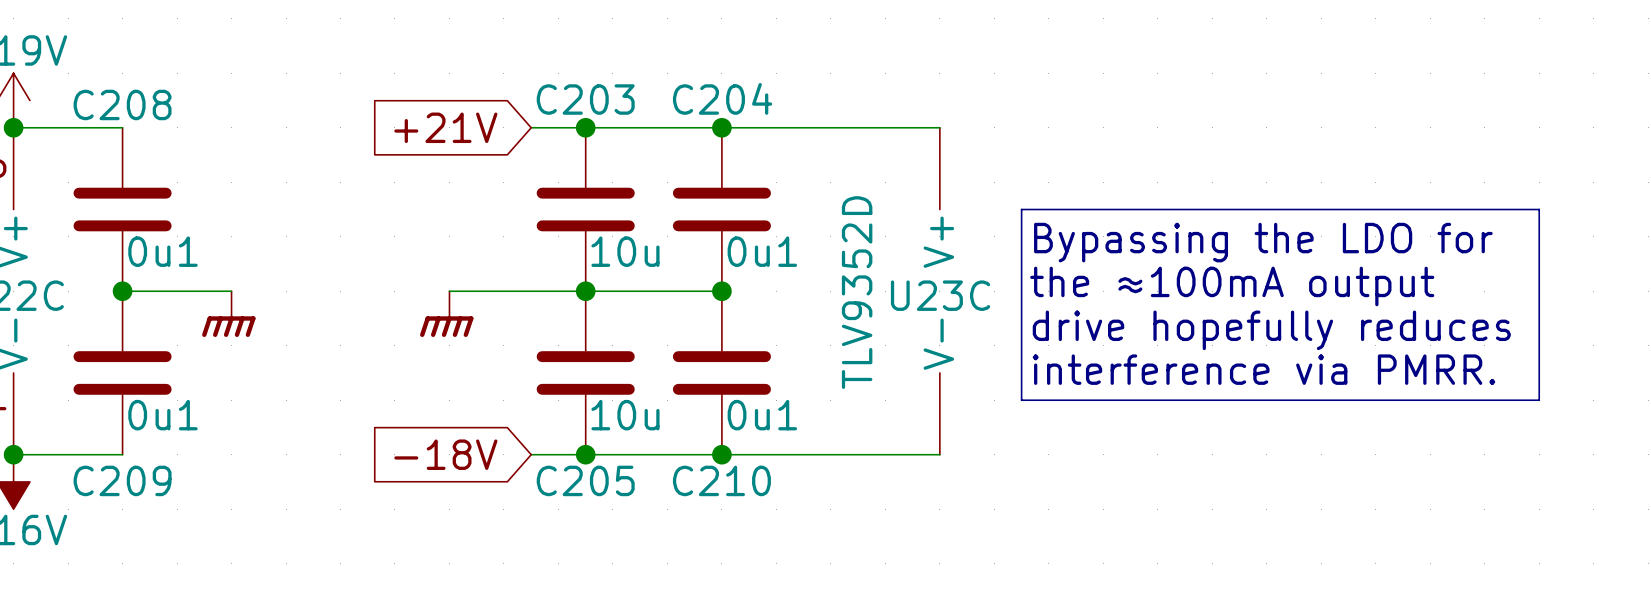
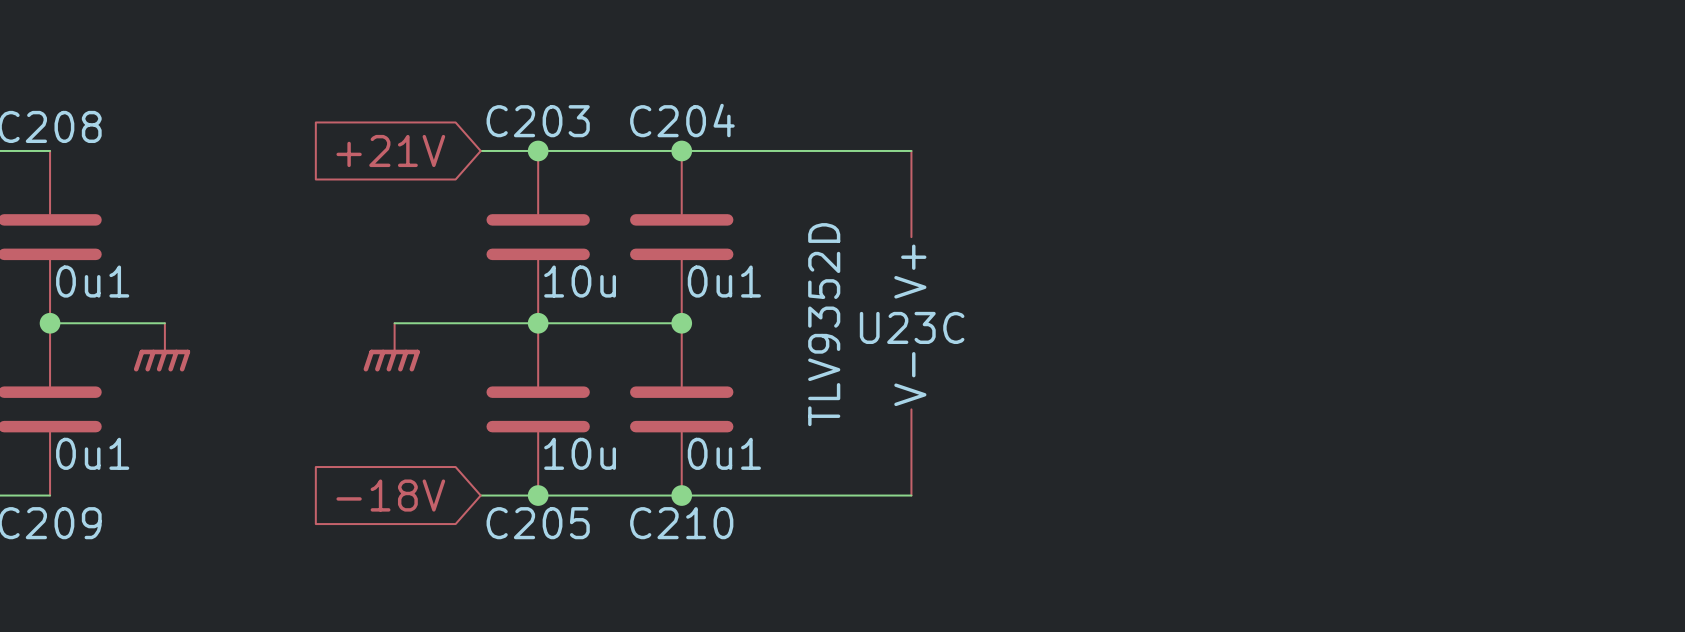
line: (1021, 209) (1539, 209) (1539, 400) (1021, 400) (1021, 209) -> none
text: Bypassing the LDO for (1263, 242) -> none
text: the ≈100mA output (1232, 286) -> none
text: drive hopefully reduces (1271, 330) -> none
text: interference via PMRR. (1264, 369) -> none

